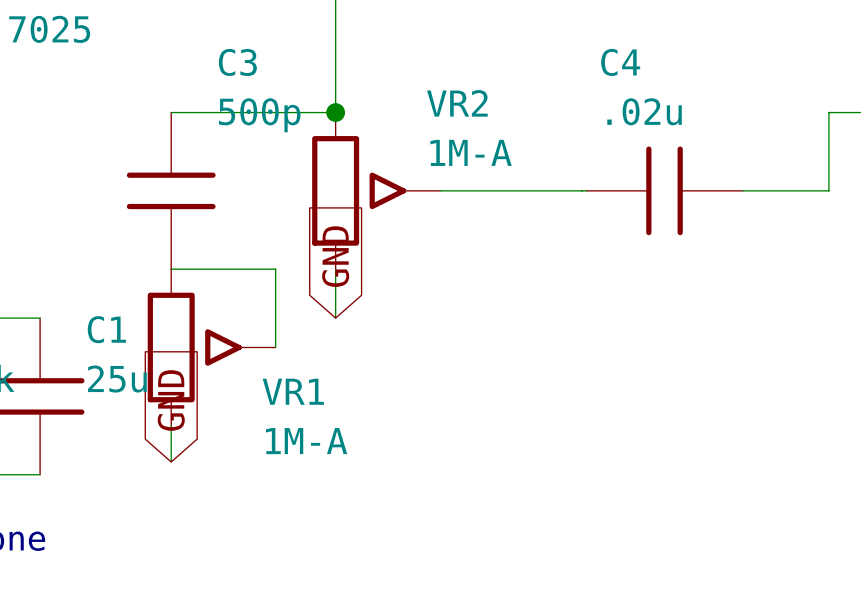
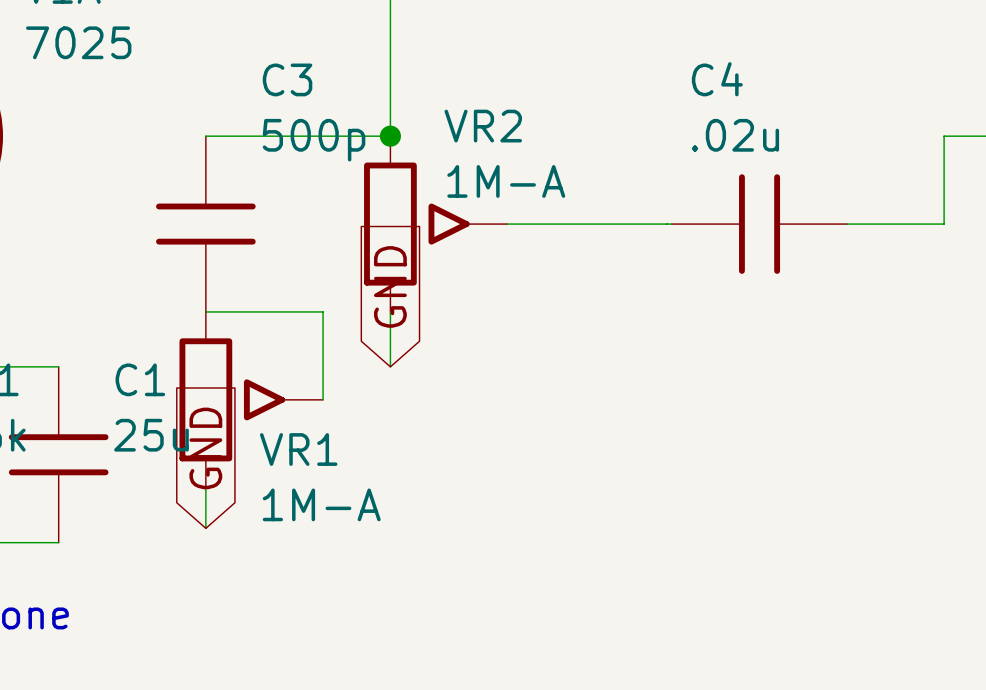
VR2 name position: VR2 (457, 103) -> VR2 (483, 126)
VR2 value position: 1M-A (471, 152) -> 1M-A (506, 181)
VR1 name position: VR1 (293, 391) -> VR1 (298, 449)
VR1 value position: 1M-A (306, 441) -> 1M-A (321, 504)

